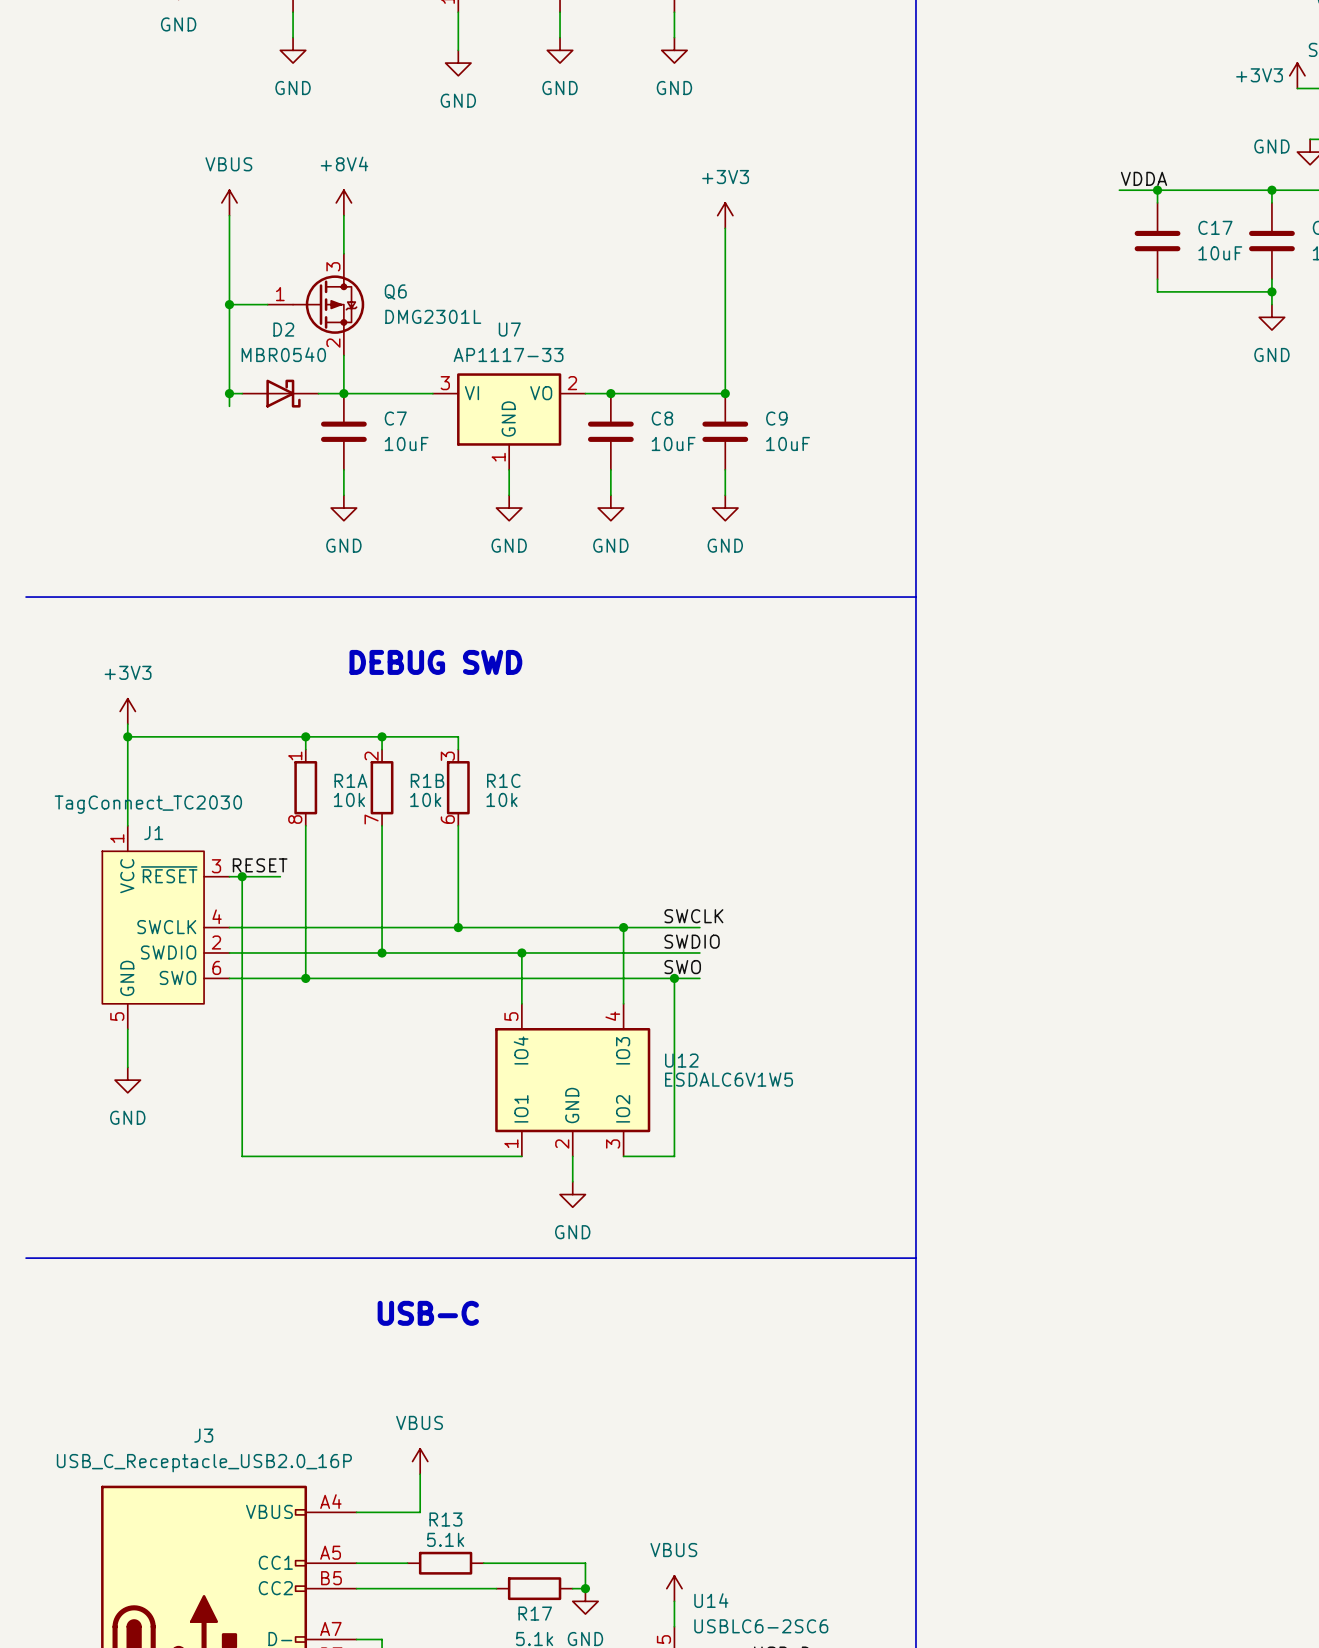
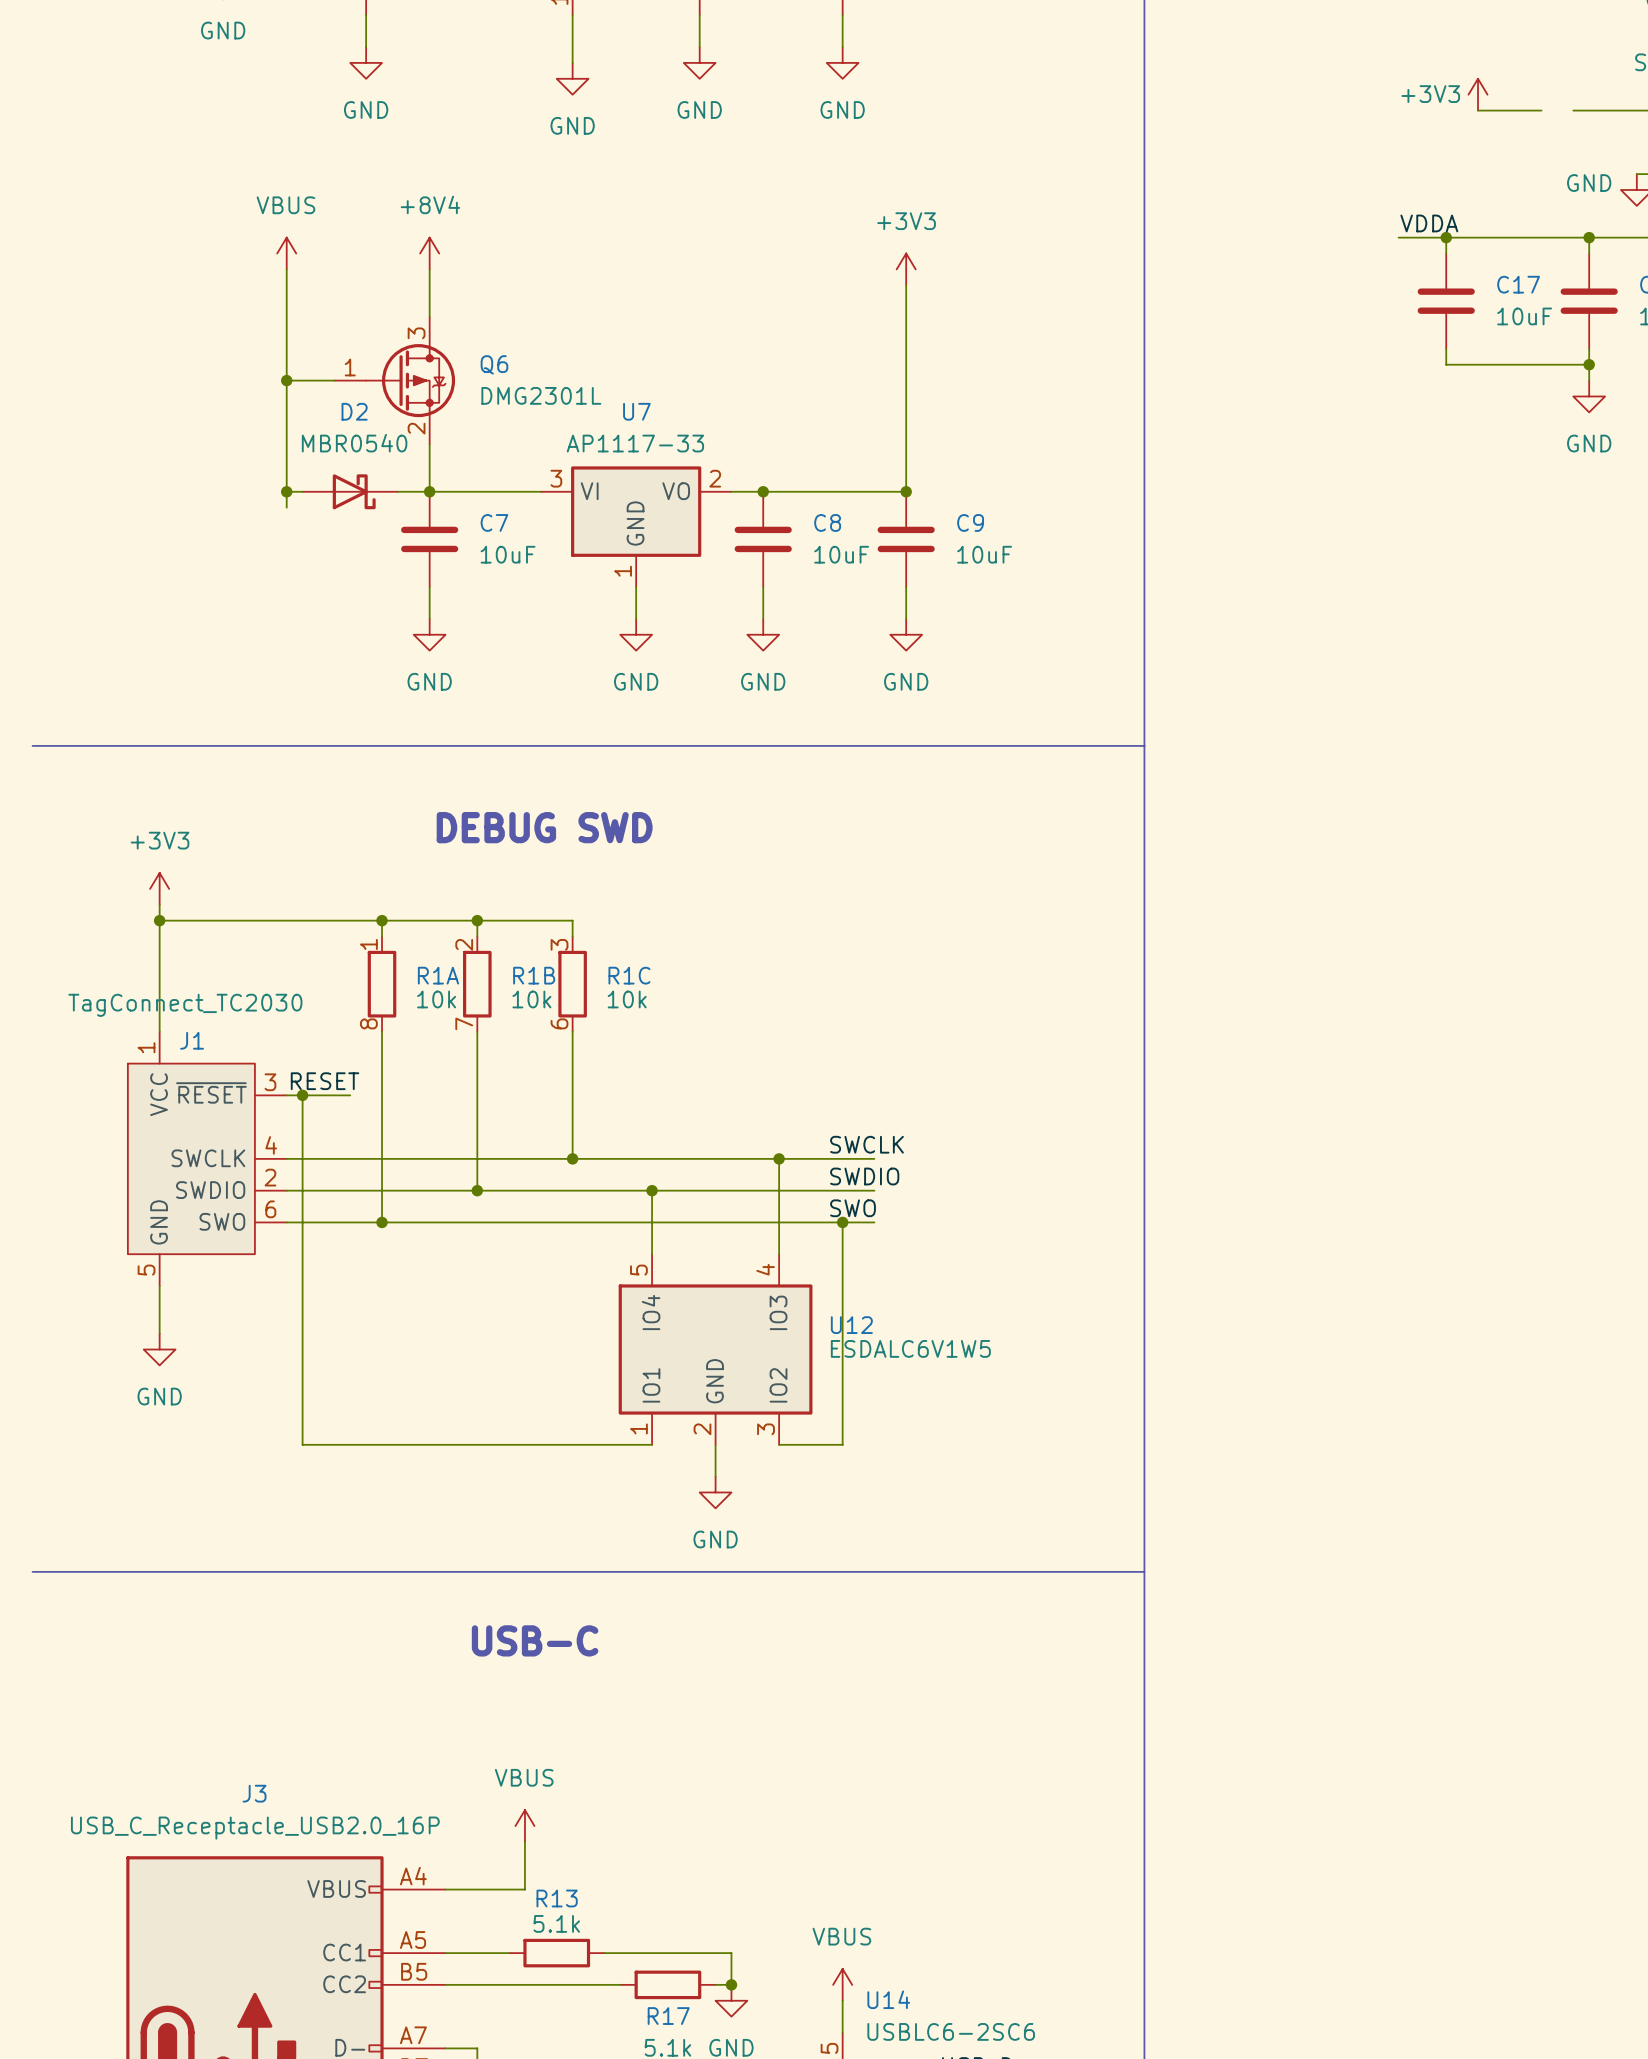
power symbol position: +3V3 (1297, 75) -> +3V3 (1478, 94)
wire: none -> (1478, 110) (1541, 110)
wire: none -> (1573, 110) (1620, 110)

